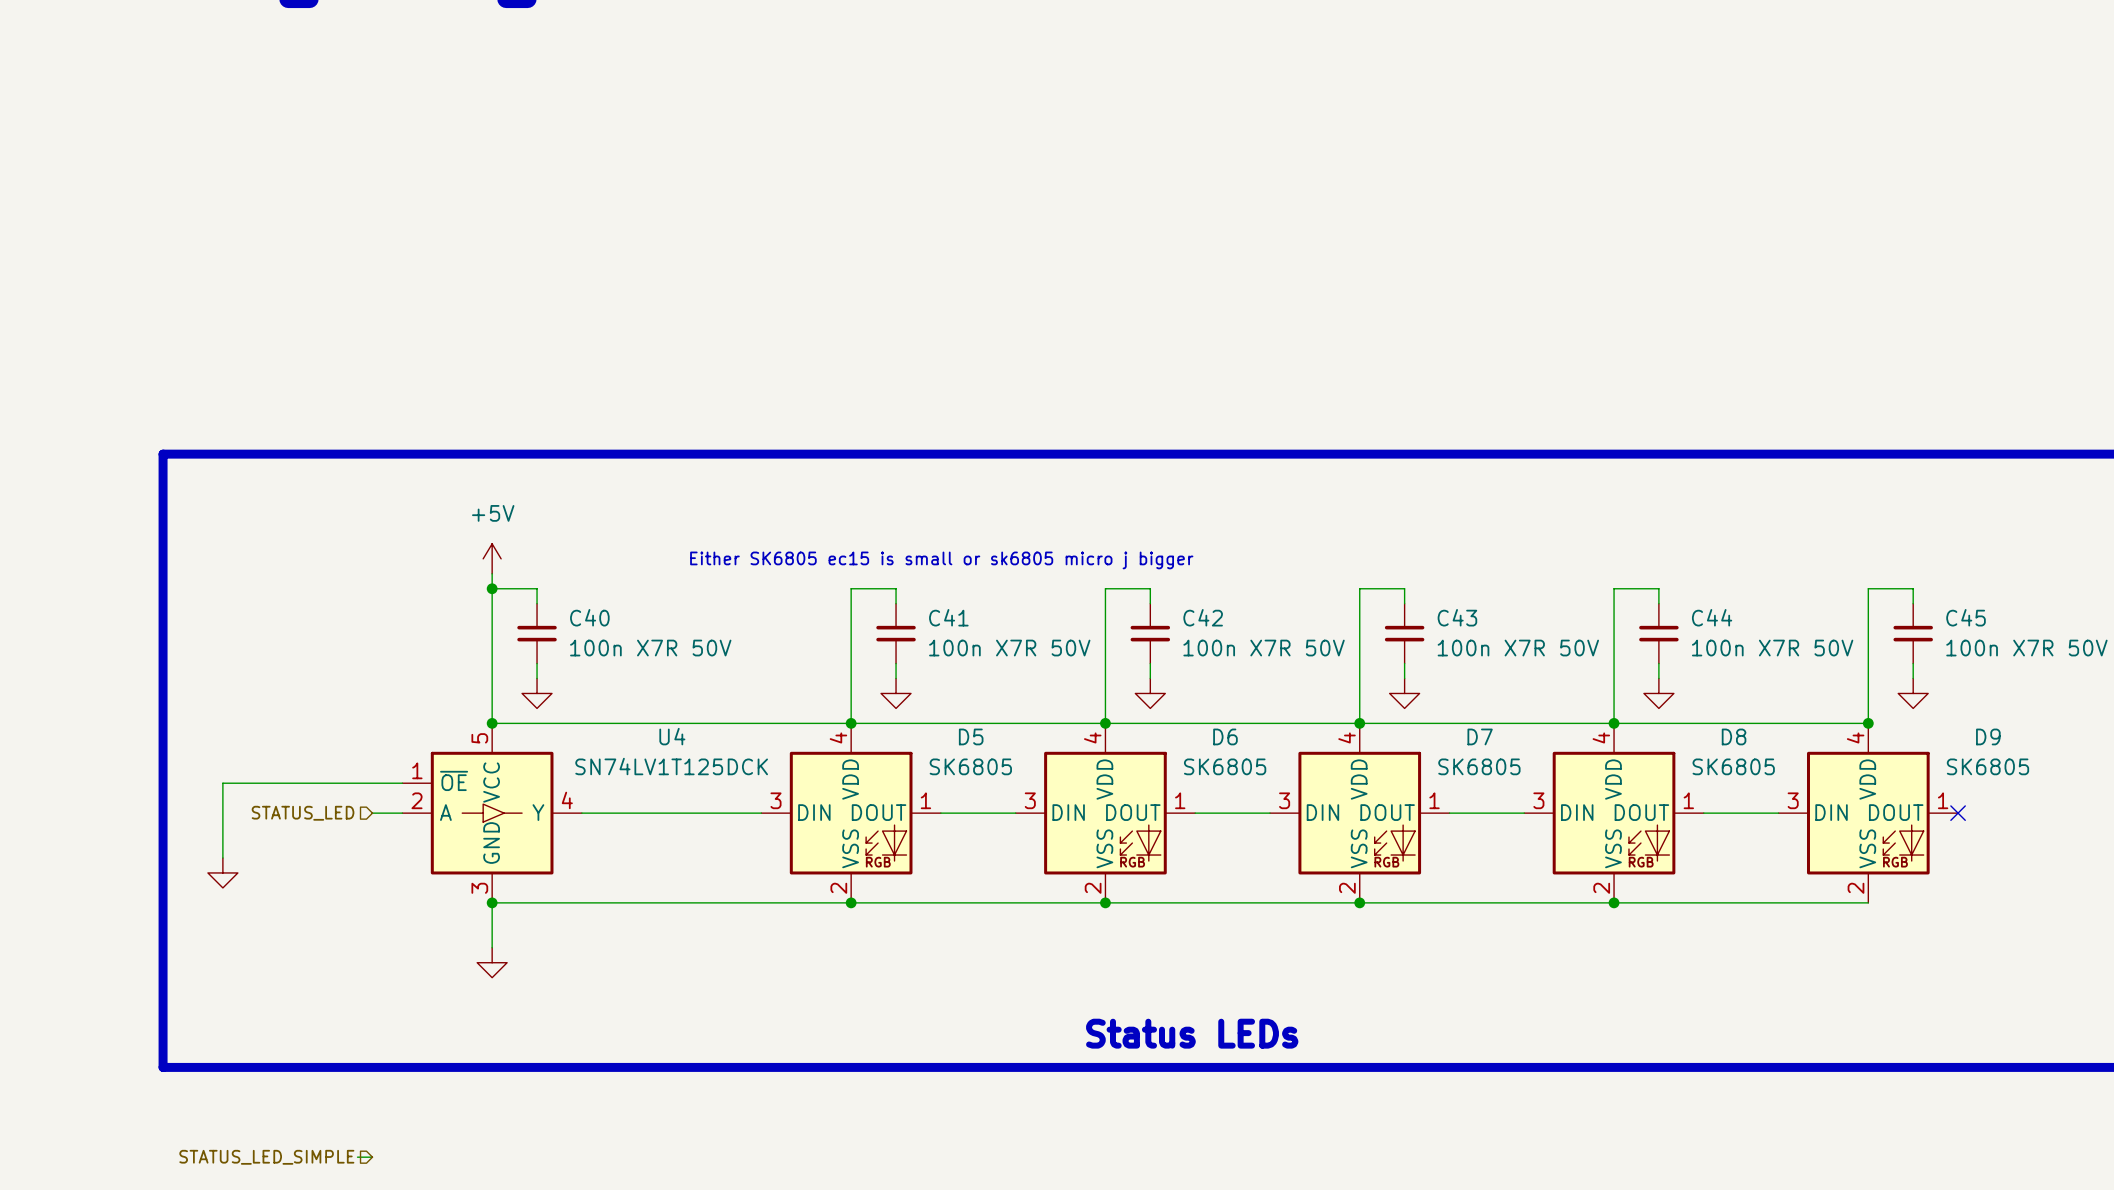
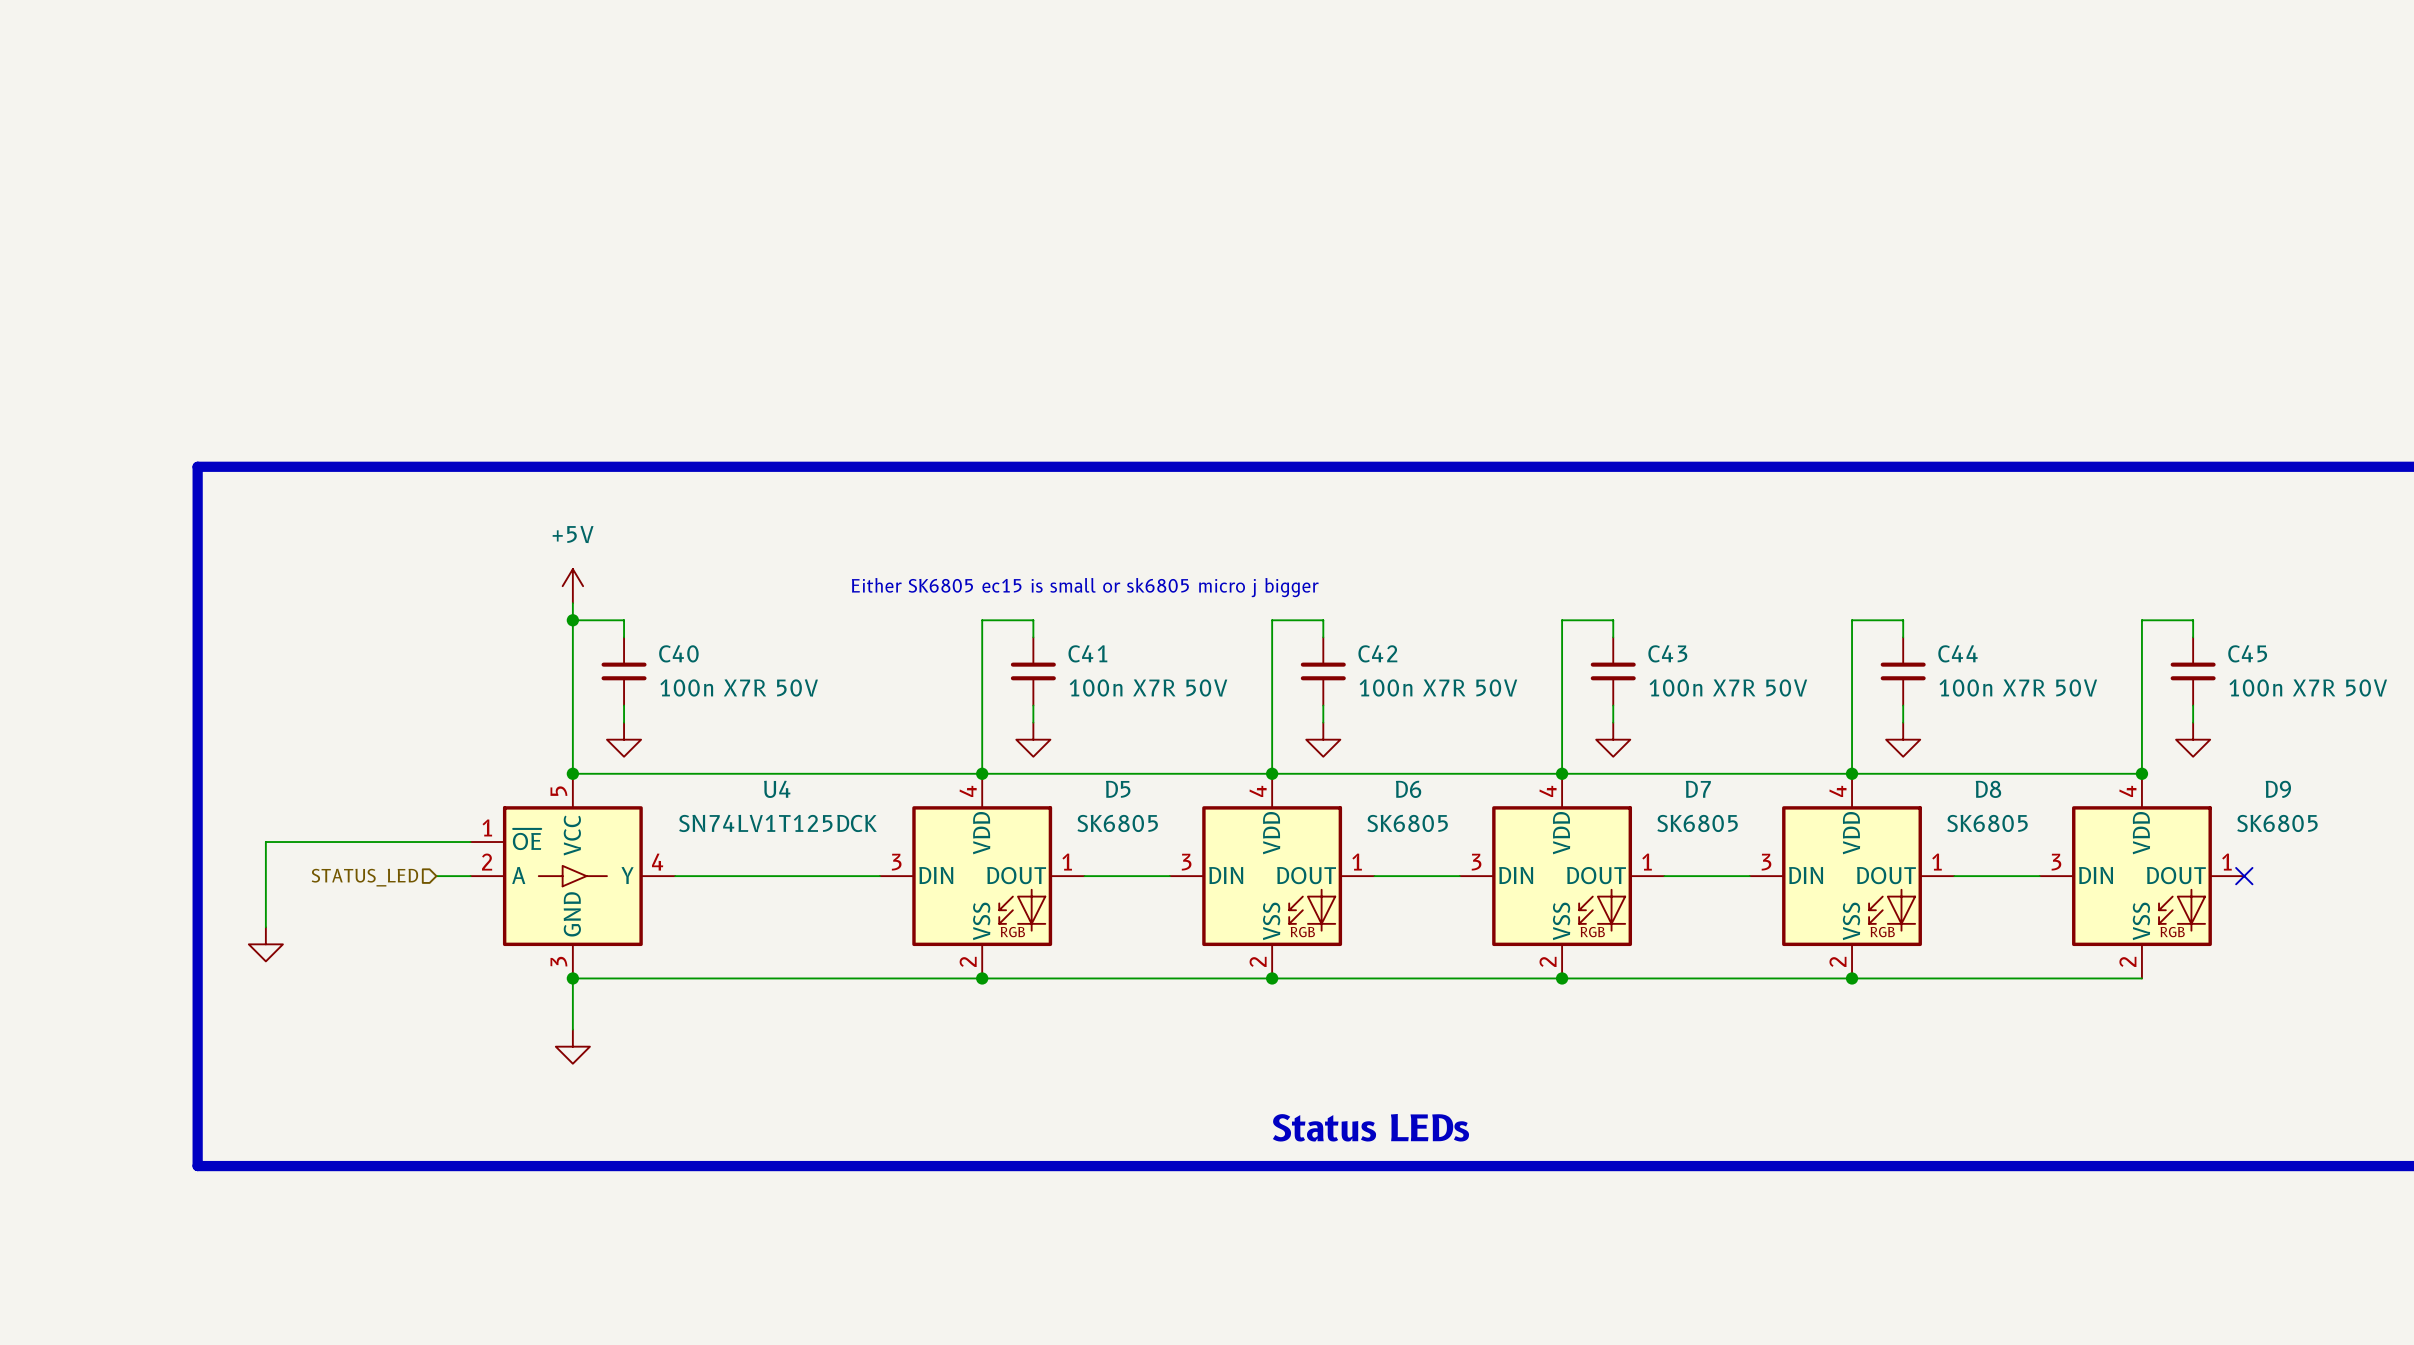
hierarchical label: STATUS_LED_SIMPLE (266, 1157) -> none
wire: (357, 1157) (372, 1157) -> none

